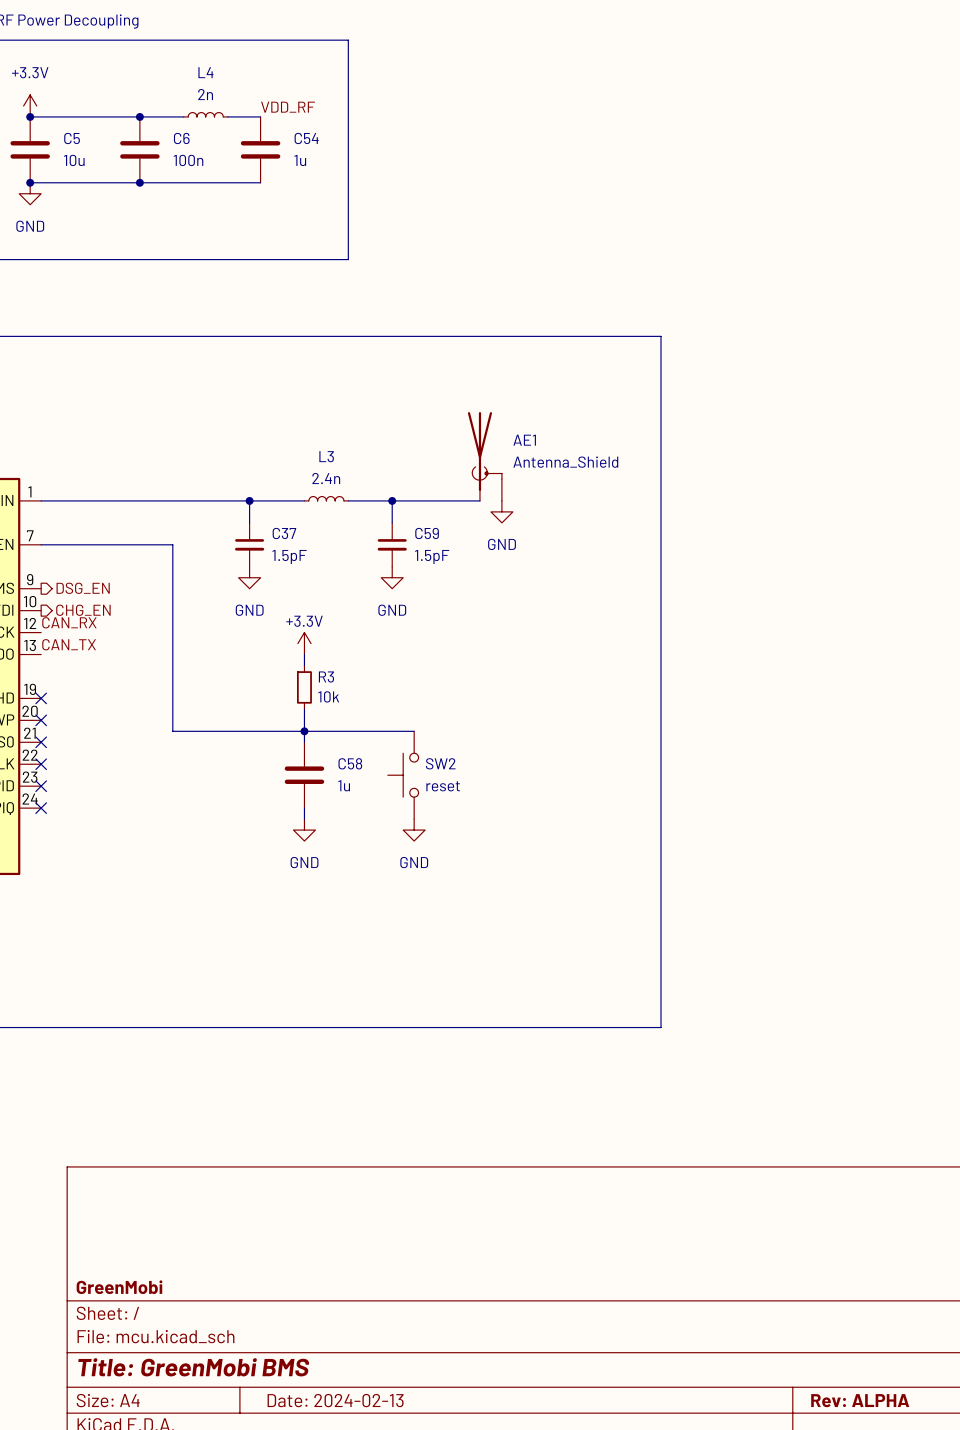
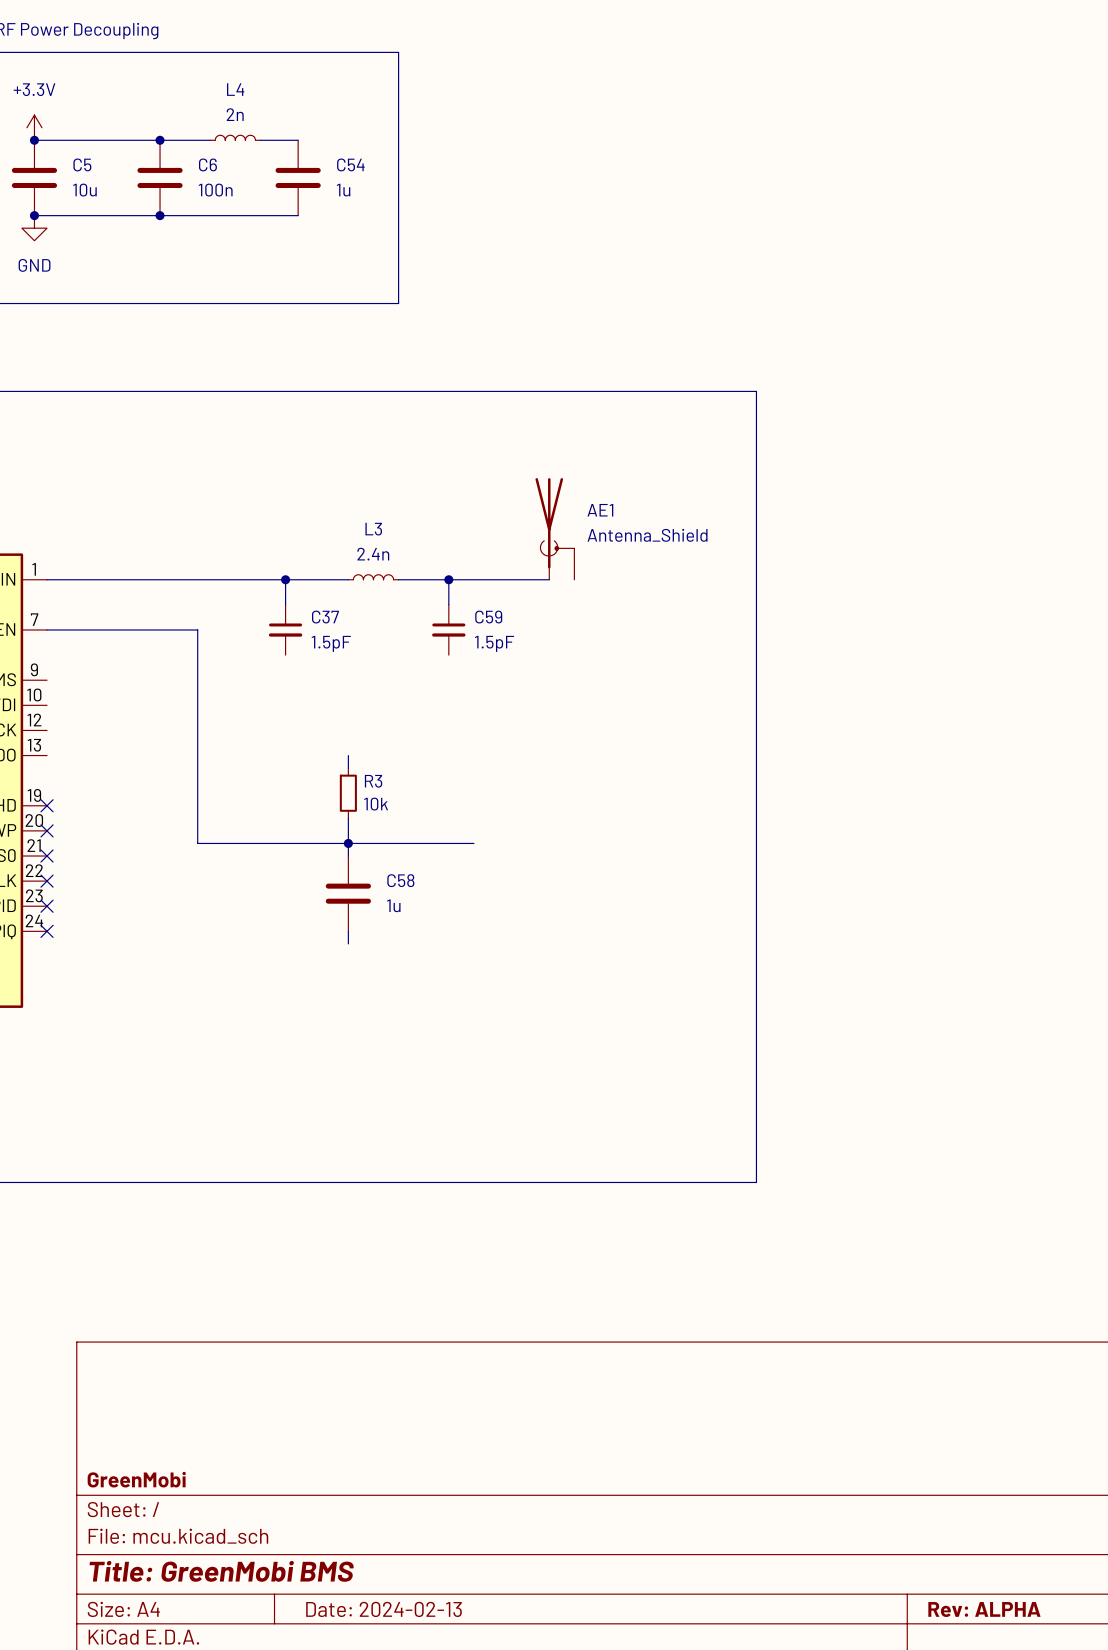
label: VDD_RF (288, 107) -> none
power symbol: GND (501, 511) -> none
power symbol: GND (249, 577) -> none
power symbol: GND (392, 577) -> none
hierarchical label: DSG_EN (83, 588) -> none
hierarchical label: CHG_EN (83, 610) -> none
label: CAN_RX (69, 622) -> none
power symbol: +3.3V (304, 643) -> none
label: CAN_TX (69, 644) -> none
SW2: reset (403, 775) -> none
power symbol: GND (304, 830) -> none
power symbol: GND (414, 830) -> none

